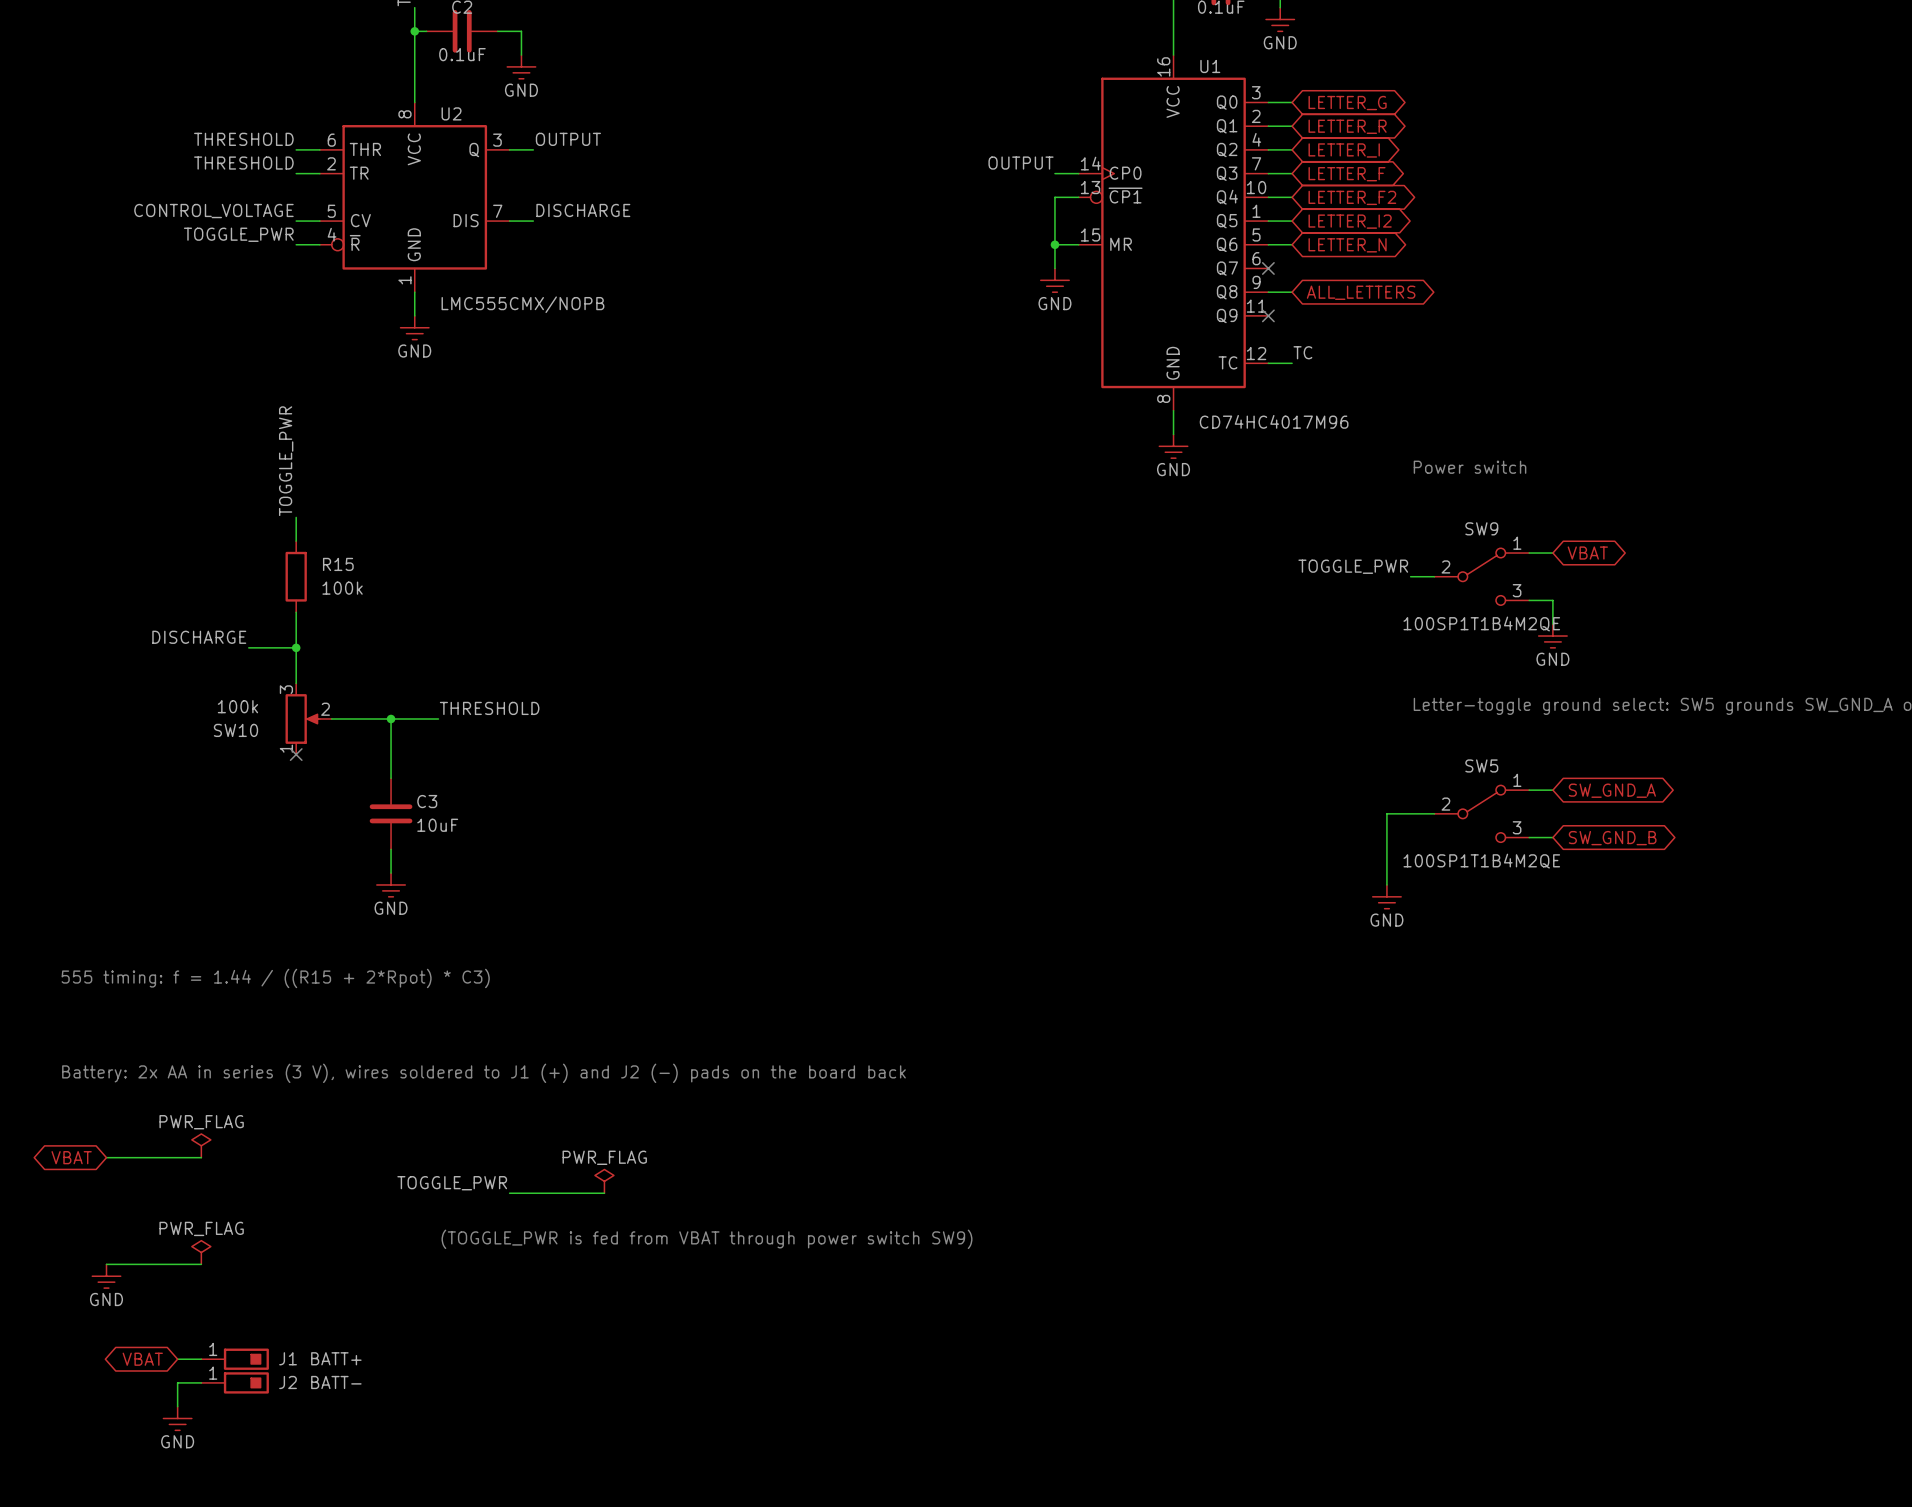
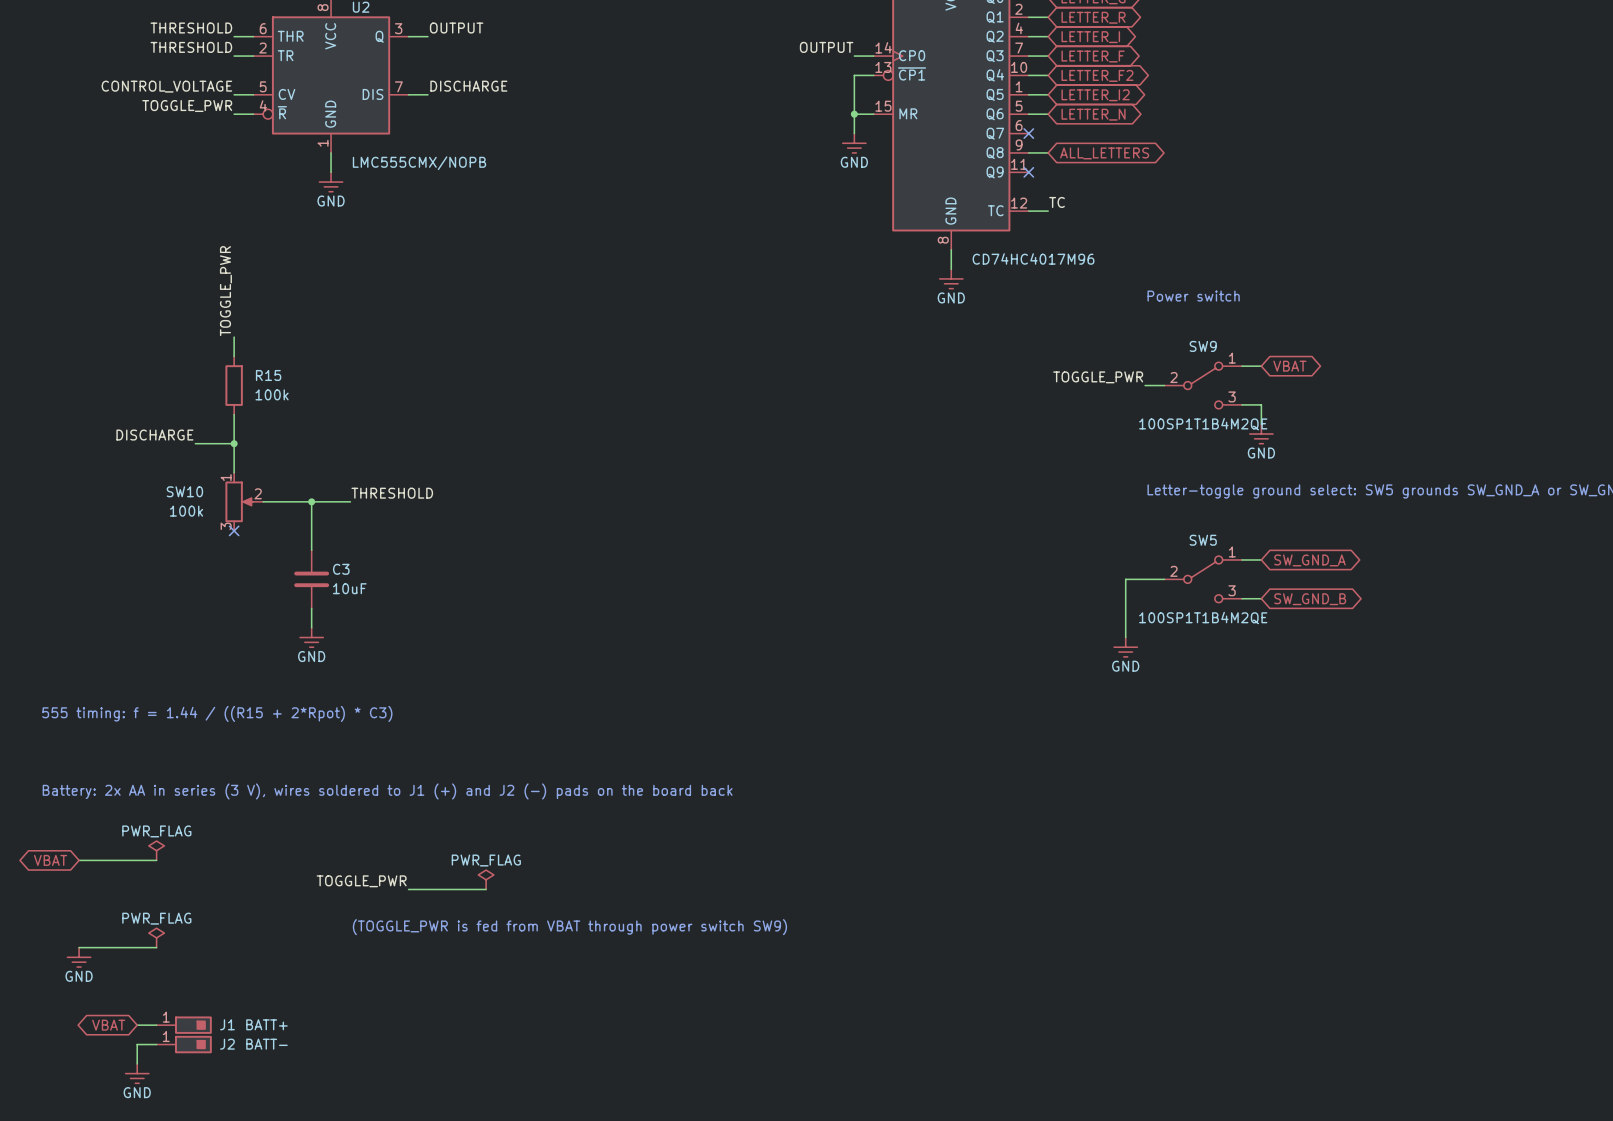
SW10 flip: as is (302, 719) -> up-down (239, 501)

